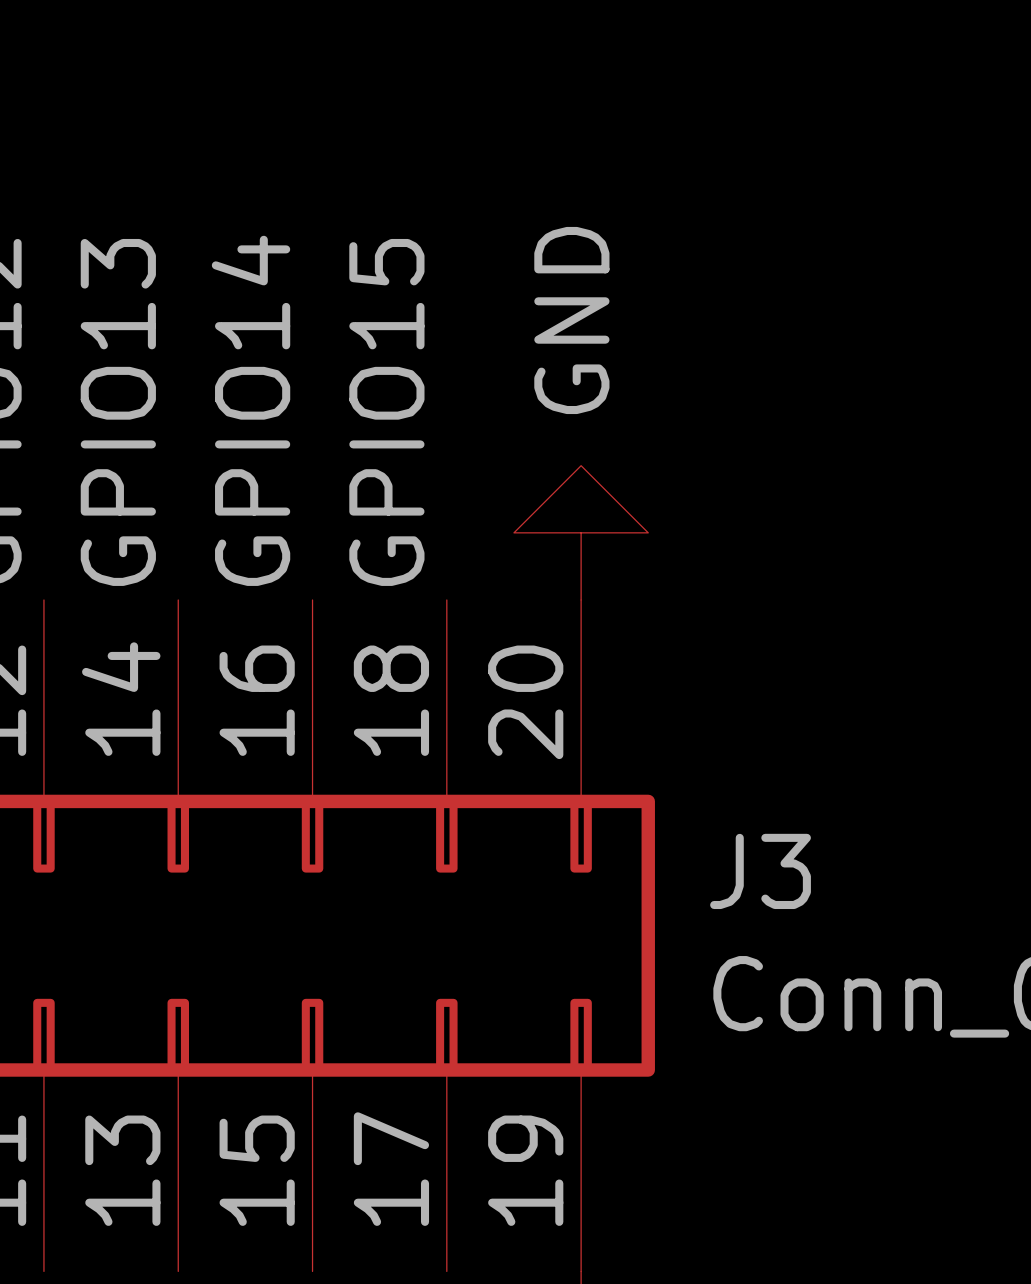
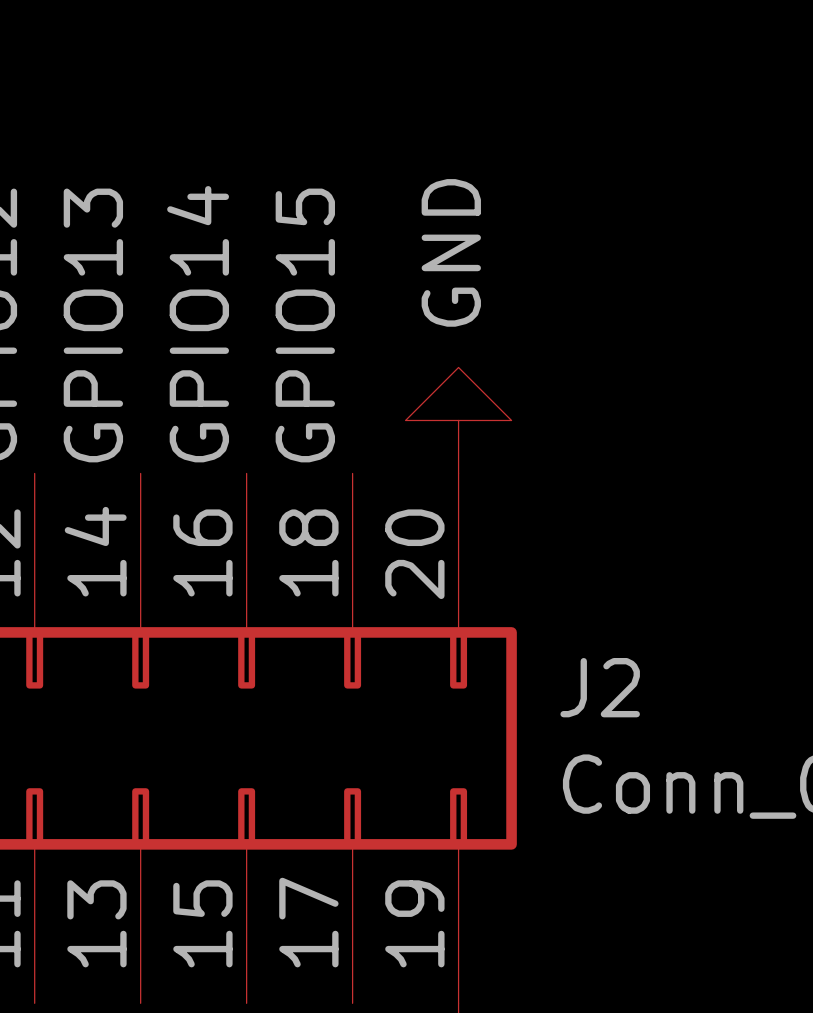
J3 name: J3 (760, 871) -> J2 (600, 687)

